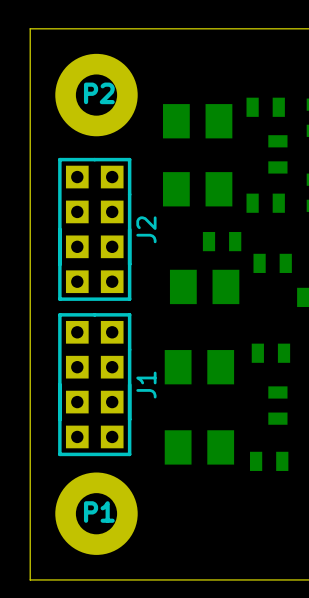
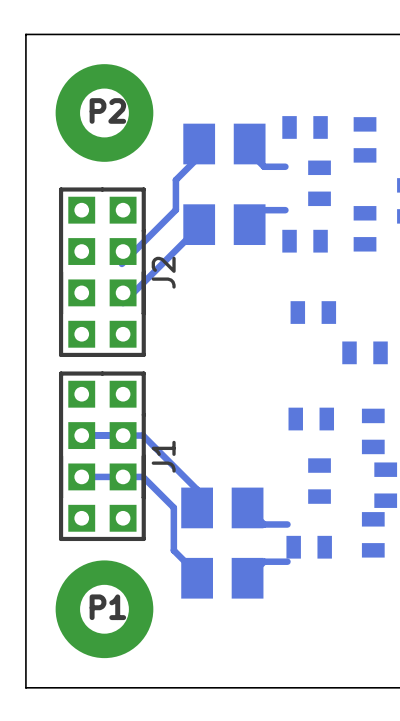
bottom track: none -> (199, 152) (199, 156) (175, 180) (175, 209) (121, 263)
bottom track: none -> (249, 152) (264, 166) (285, 166)
bottom track: none -> (285, 210) (262, 210) (249, 222)
bottom track: none -> (199, 222) (199, 227) (123, 303)
part: (222, 241) -> none
part: (204, 286) -> none
bottom track: none -> (81, 435) (143, 435) (197, 489) (197, 507)
part: (199, 367) -> none
bottom track: none -> (81, 476) (143, 476) (173, 507) (173, 550) (197, 573) (197, 578)
bottom track: none -> (247, 507) (264, 524) (287, 524)
part position: (199, 447) -> (222, 507)
bottom track: none -> (287, 561) (264, 561) (247, 578)
part: none -> (222, 578)

